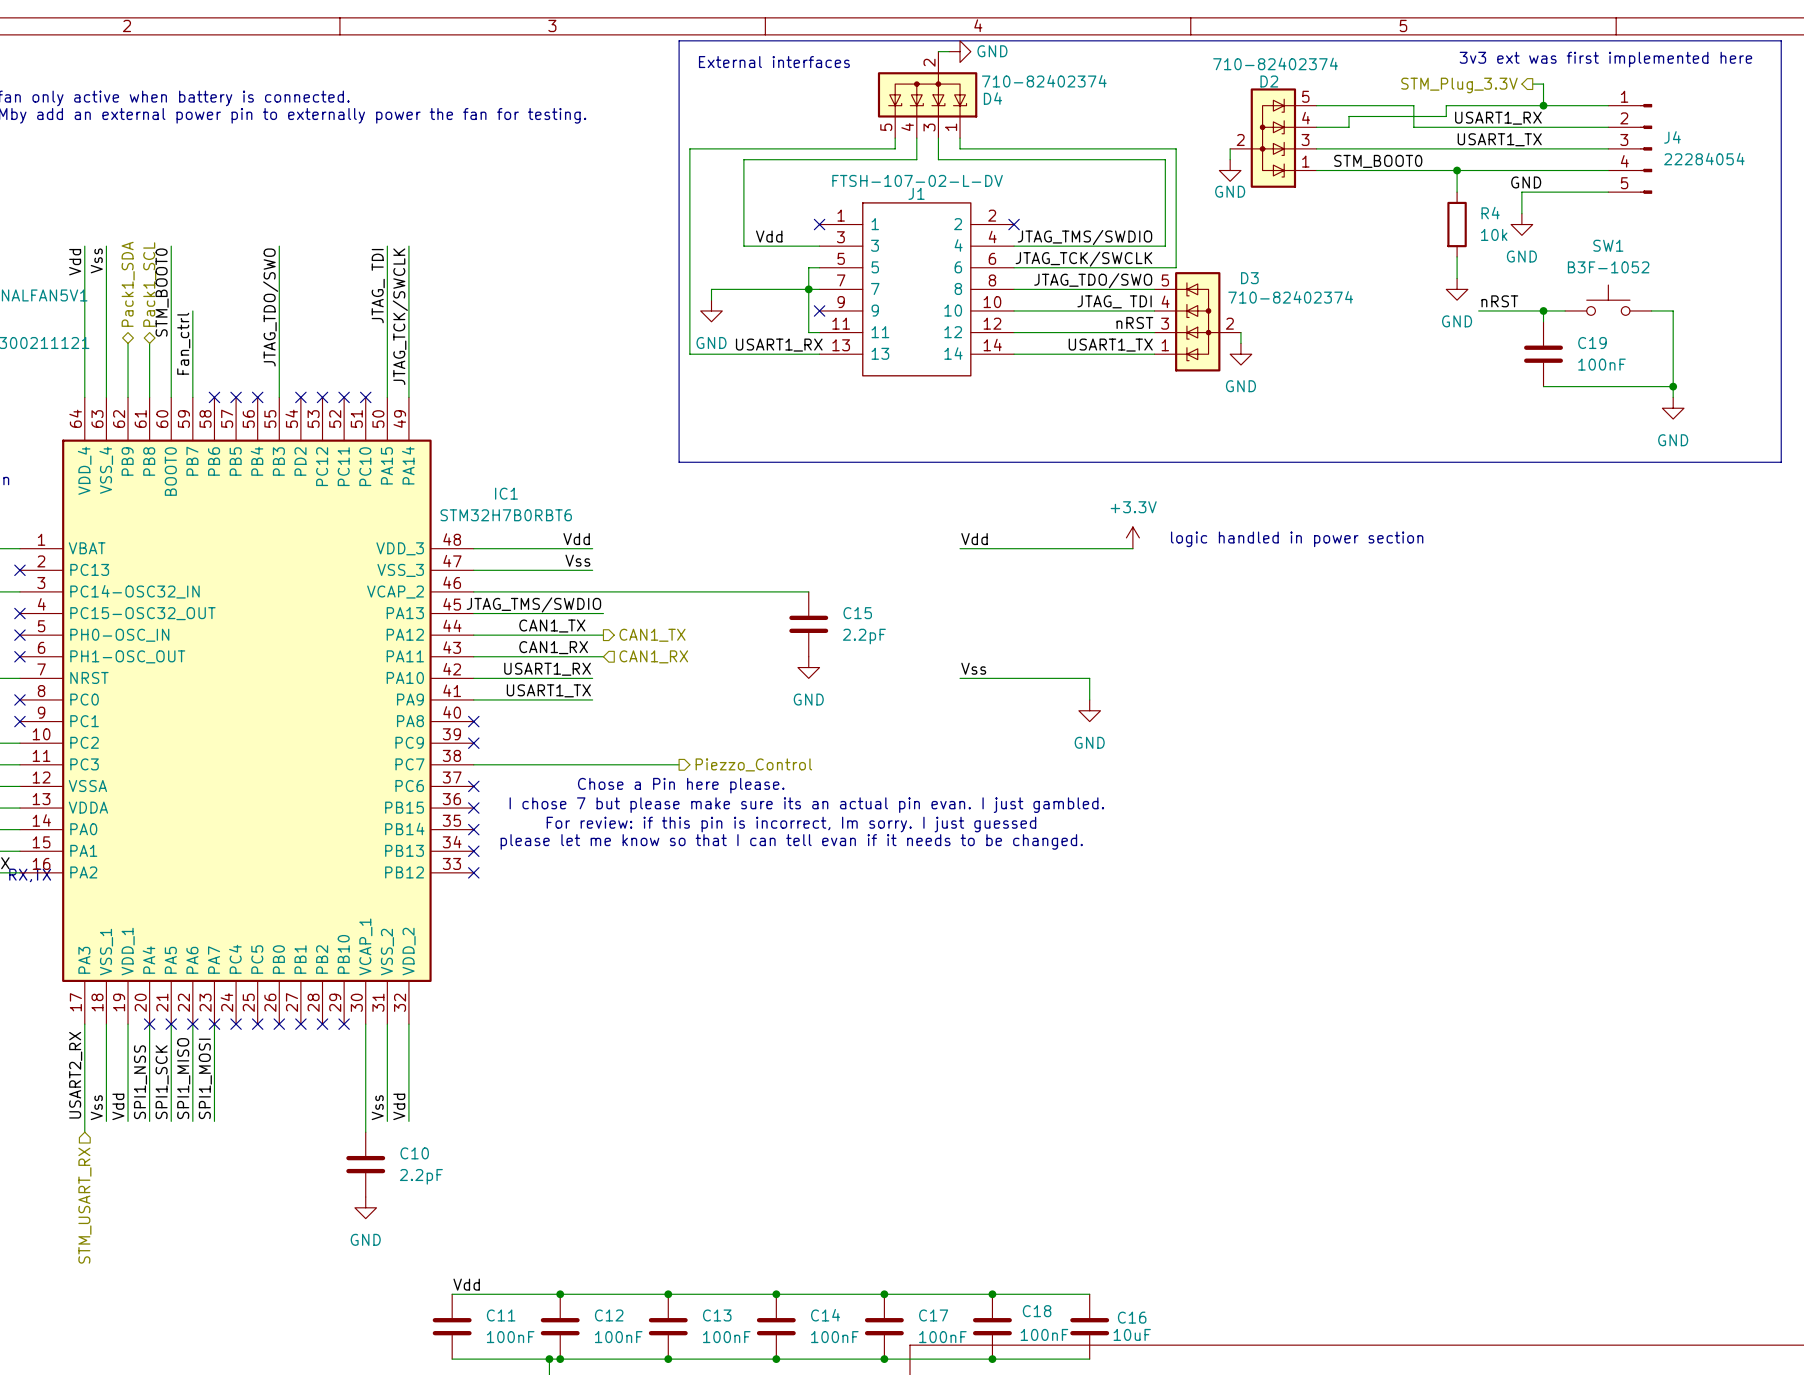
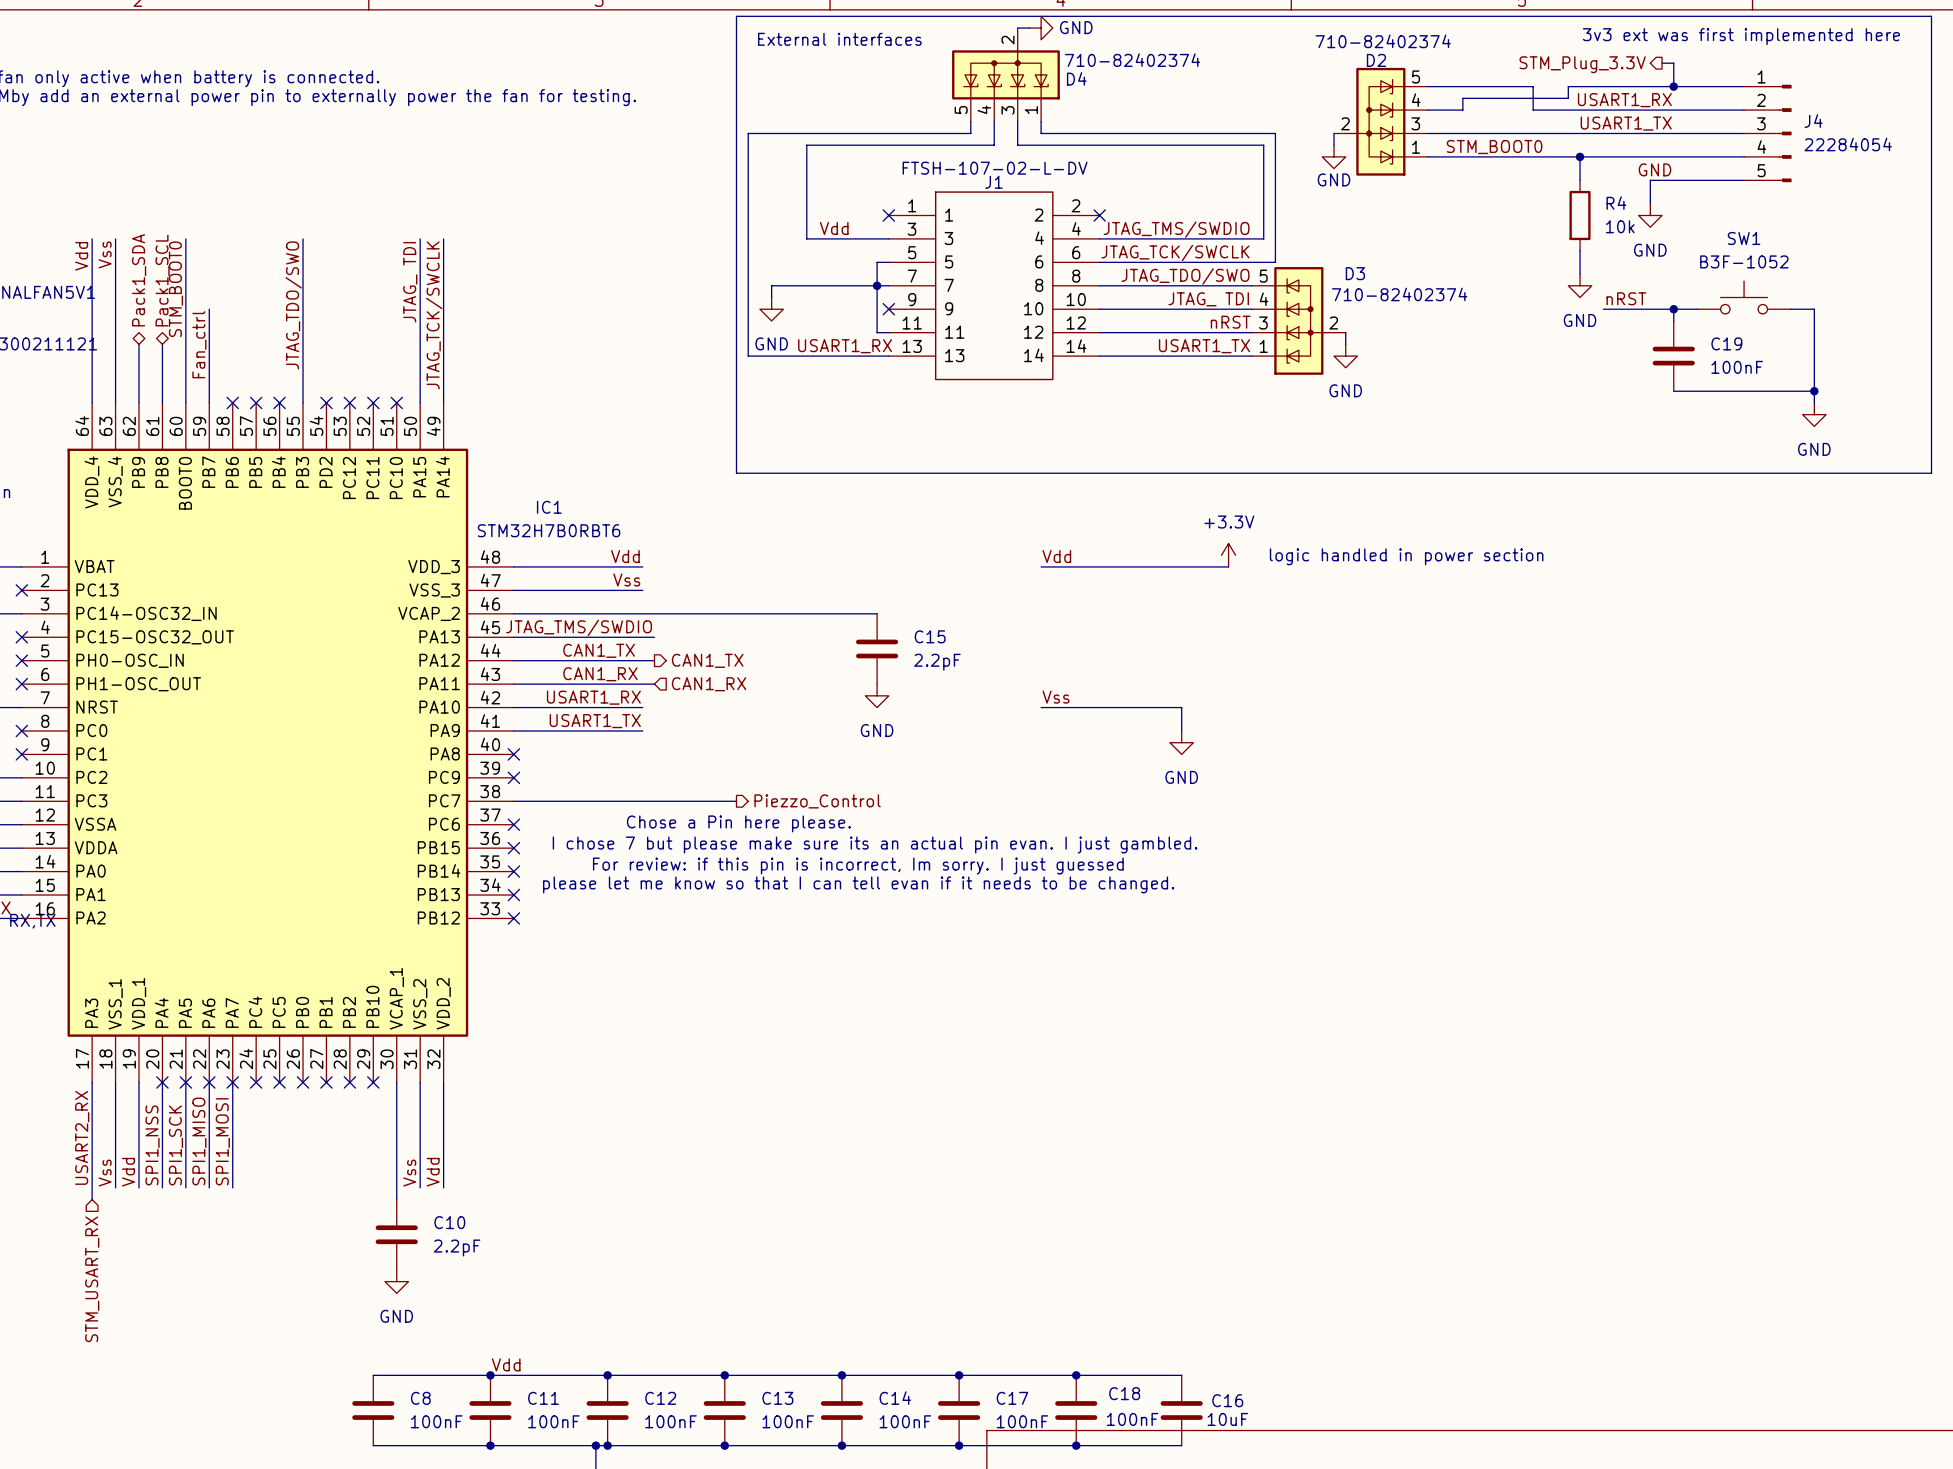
wire: none -> (373, 1375) (490, 1375)
junction: none -> (490, 1375)
C8: none -> 100nF (373, 1410)
wire: none -> (373, 1445) (490, 1445)
junction: none -> (490, 1445)

